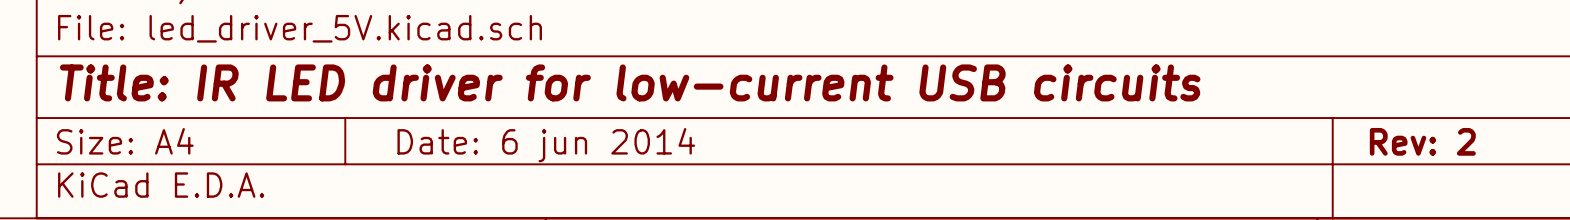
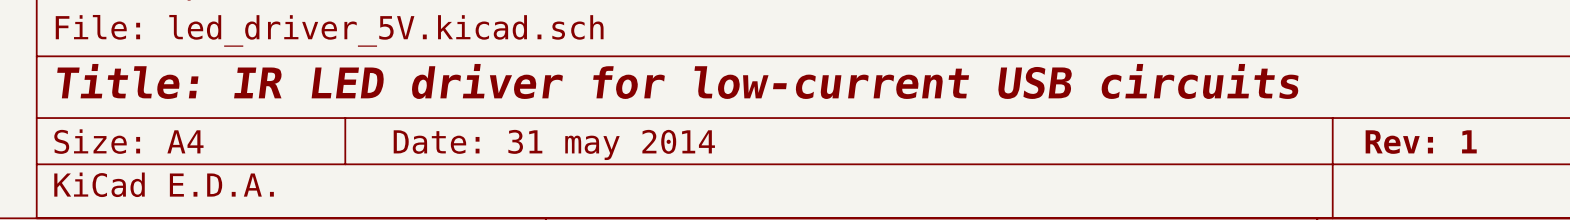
title block: Rev: 2 (1422, 141) -> Rev: 1 (1421, 142)
title block: Date: 6 jun 2014 (546, 145) -> Date: 31 may 2014 (554, 144)

